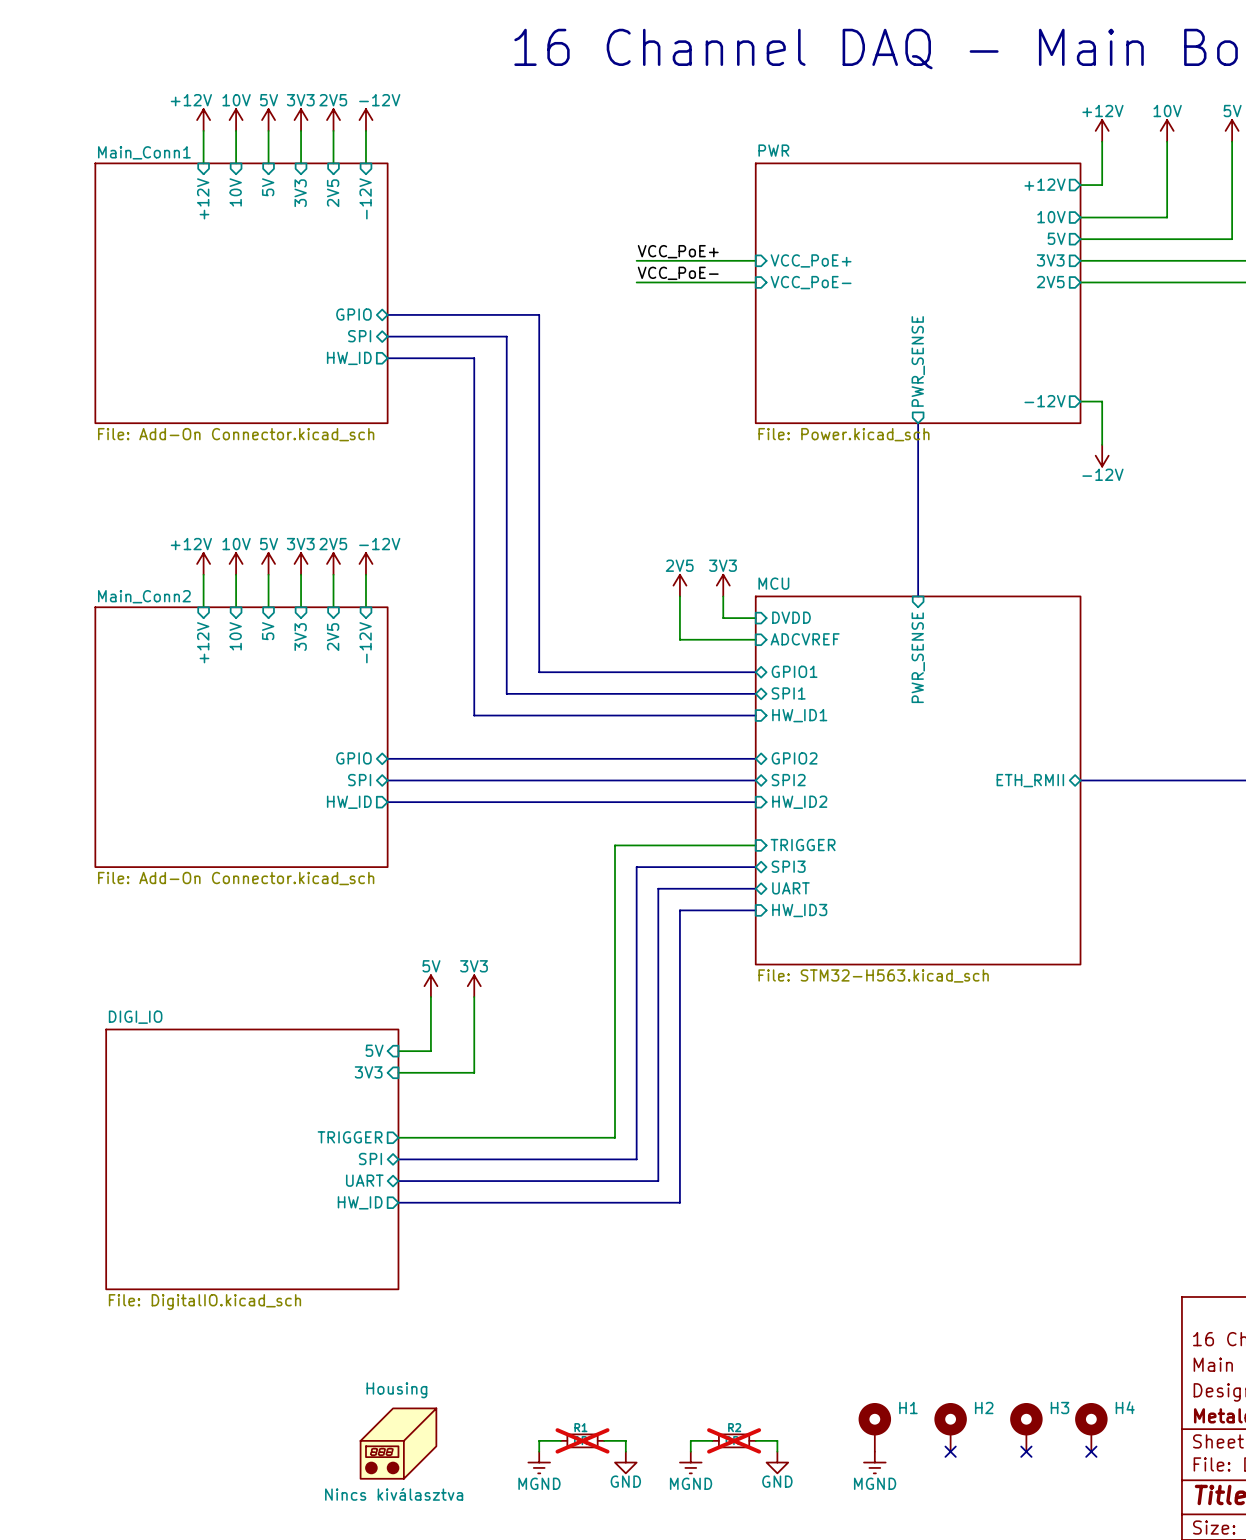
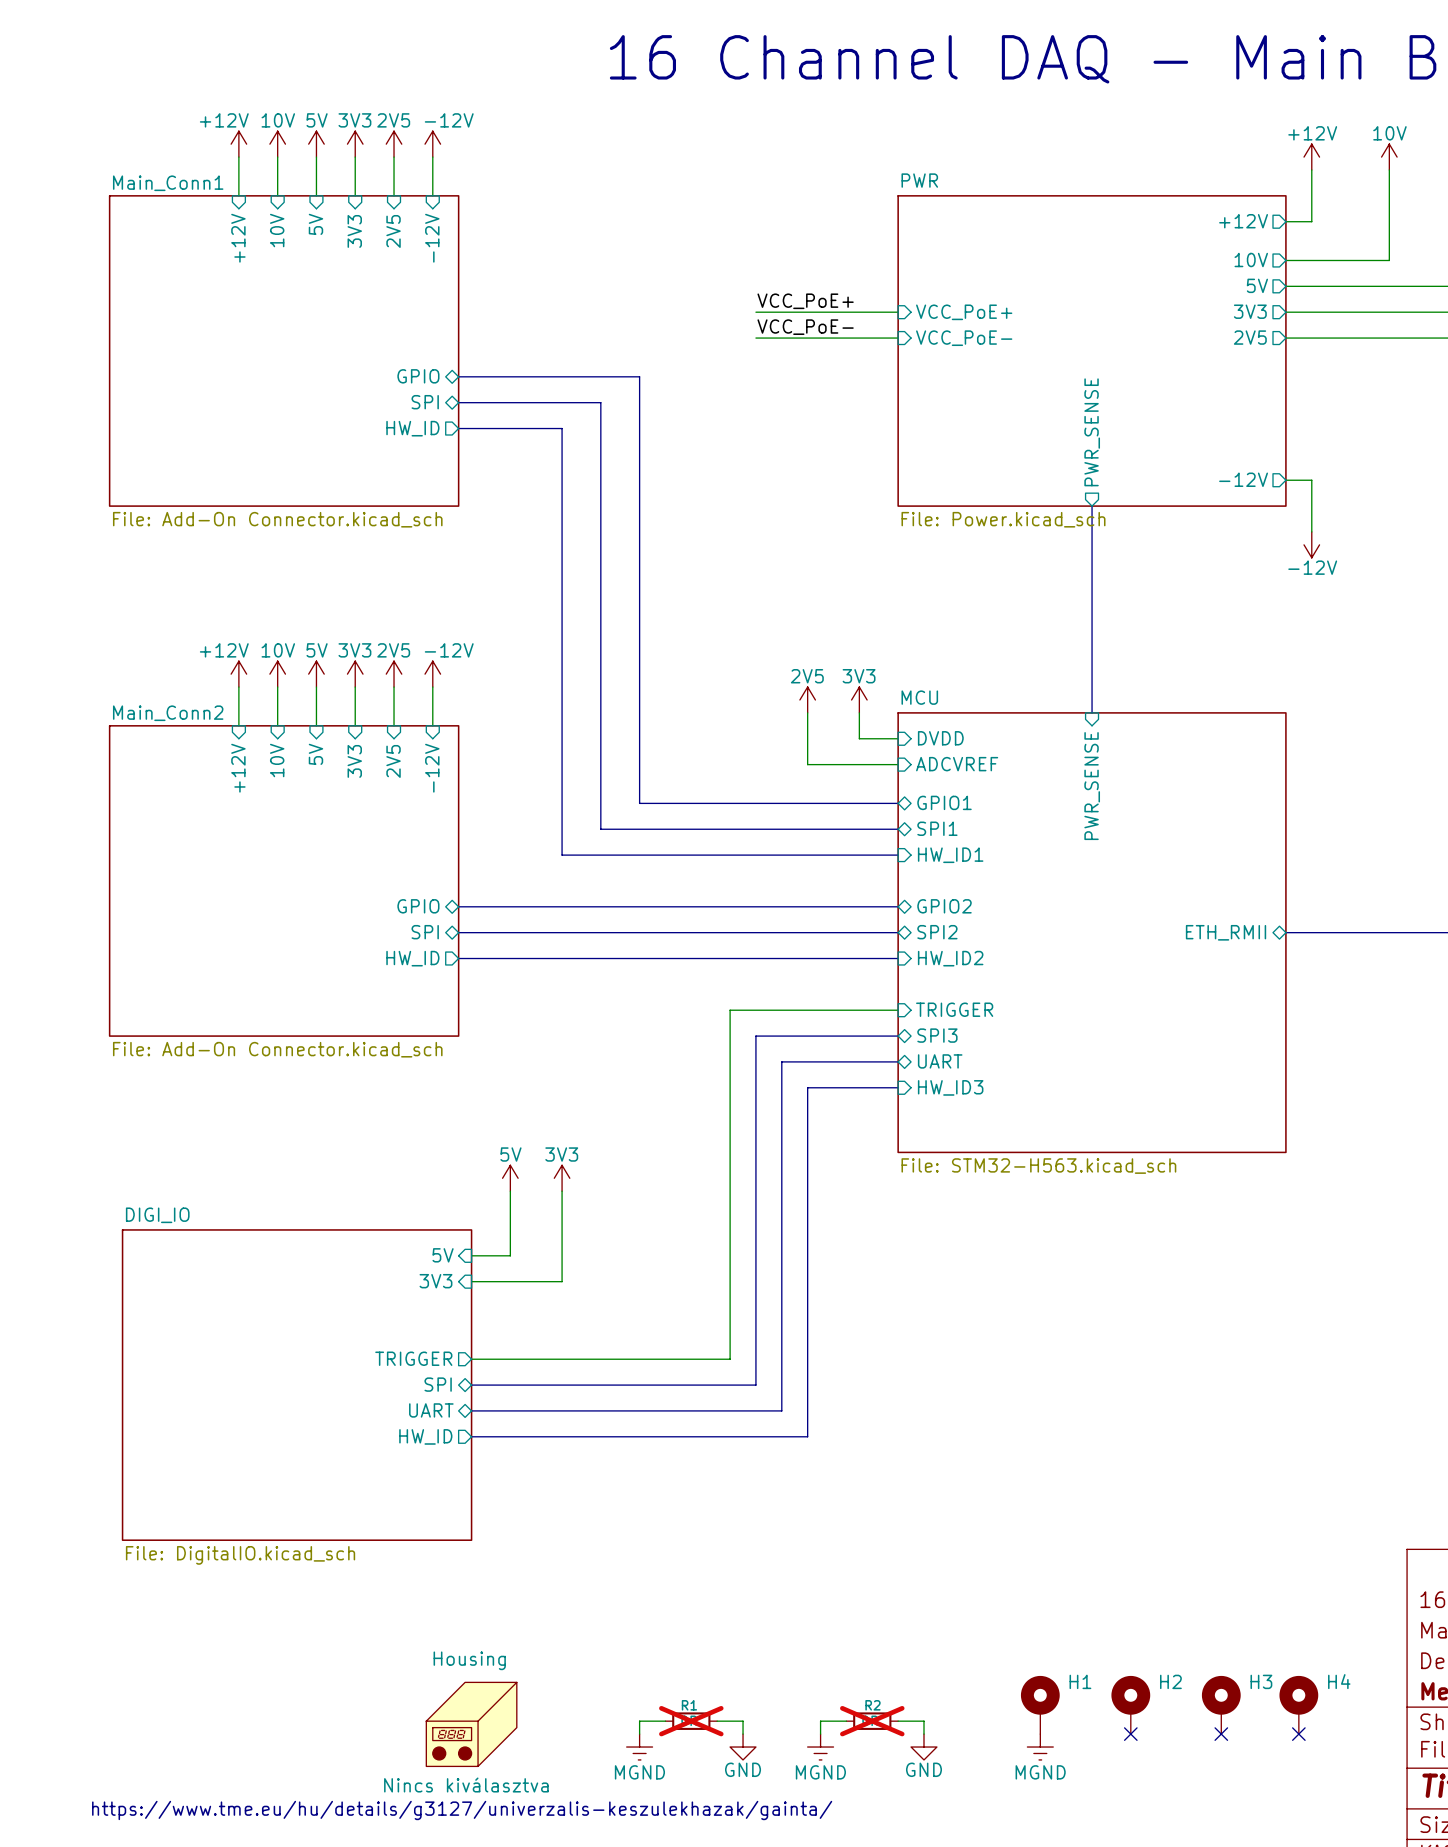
text: none -> https://www.tme.eu/hu/details/g3127/univerzalis-keszulekhazak/gainta/ (462, 1810)

